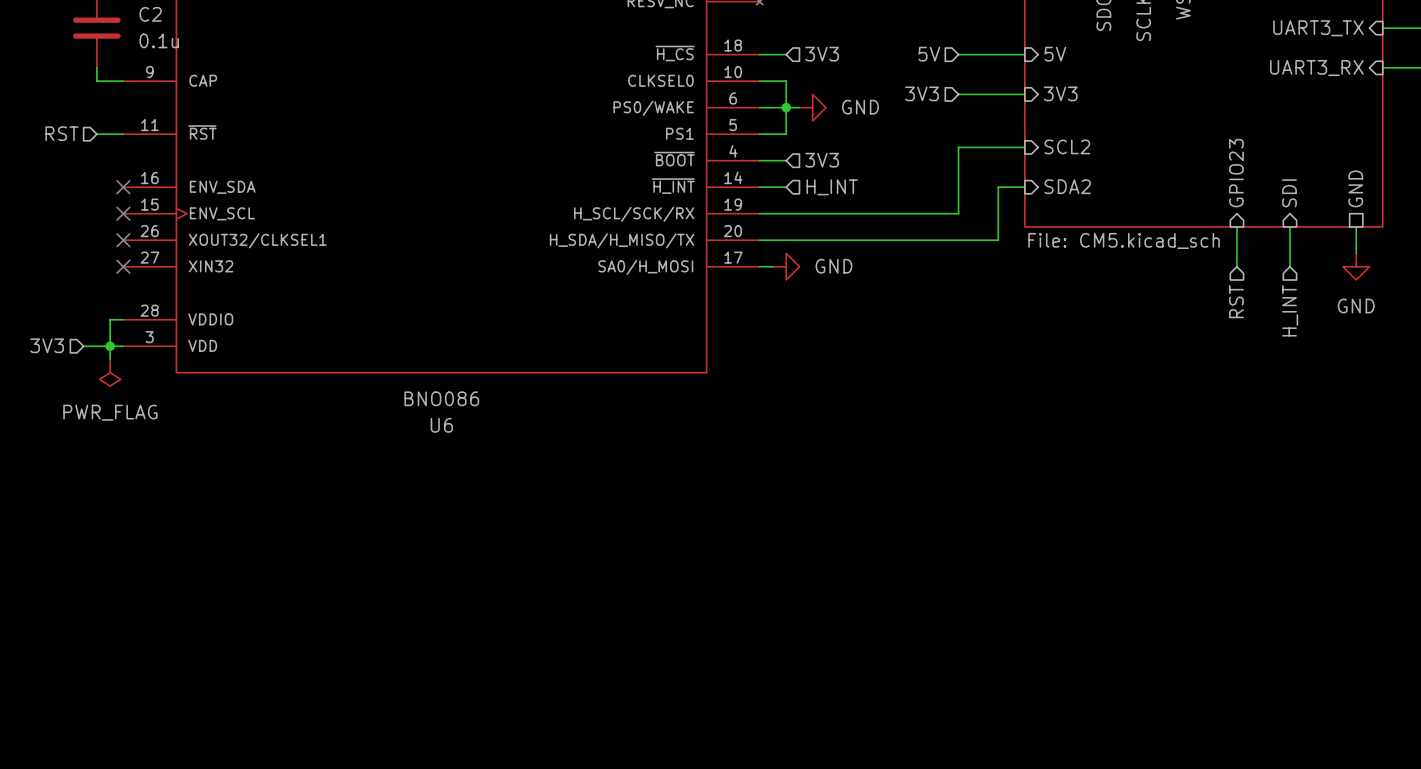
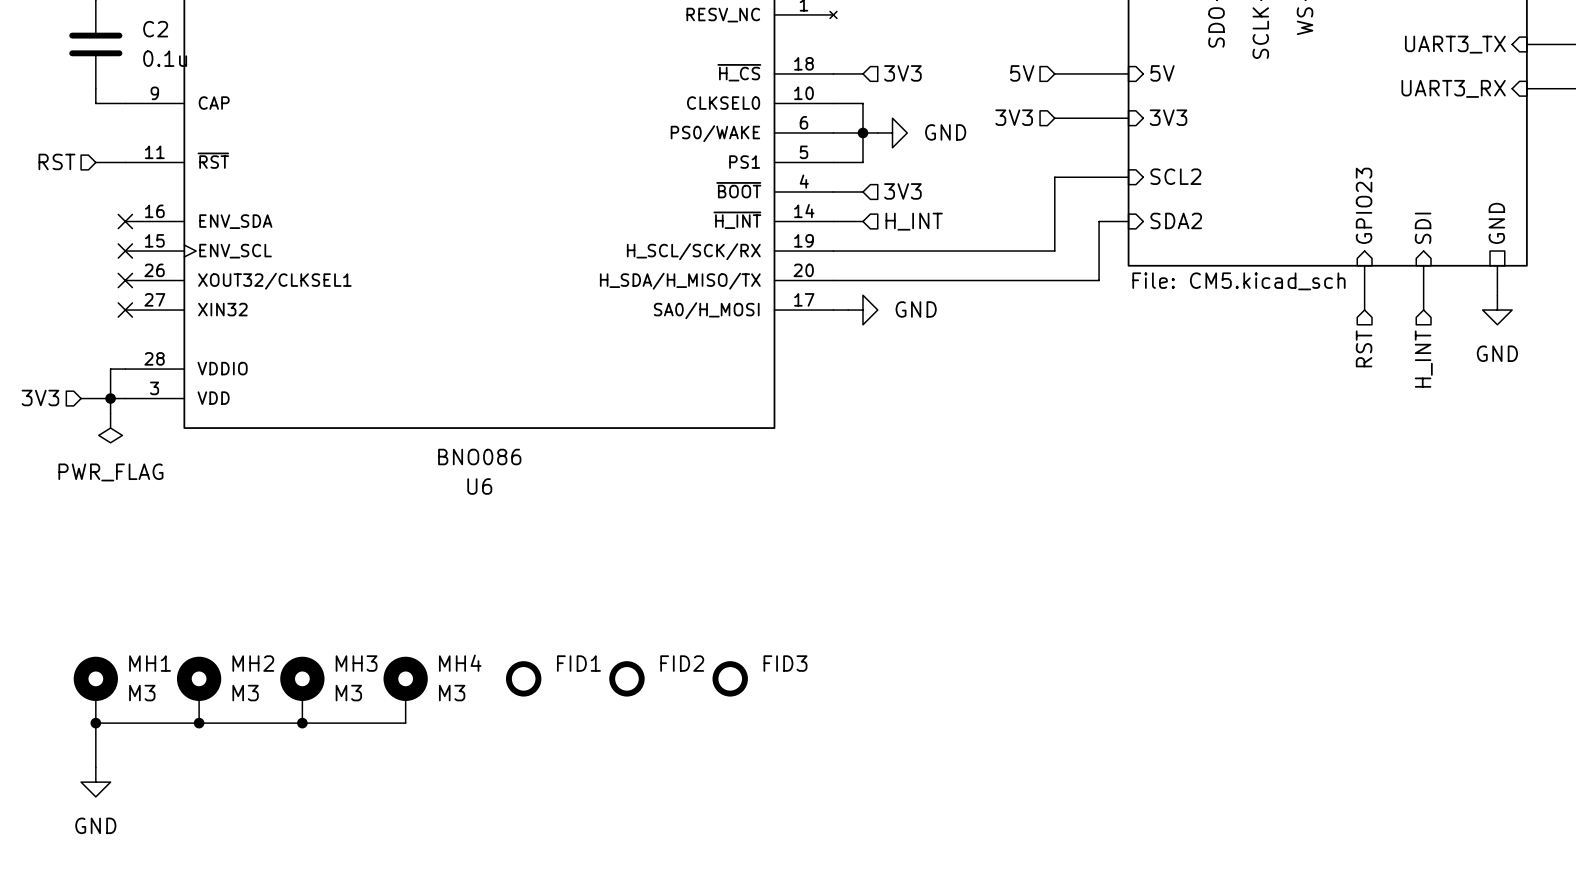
FID1: none -> (523, 678)
FID2: none -> (626, 678)
FID3: none -> (730, 678)
MH1: none -> M3 (95, 689)
MH2: none -> M3 (199, 689)
MH3: none -> M3 (302, 689)
MH4: none -> M3 (405, 689)
junction: none -> (95, 723)
junction: none -> (199, 723)
junction: none -> (302, 723)
wire: none -> (405, 723) (95, 723) (95, 767)
power symbol: none -> GND (95, 782)

